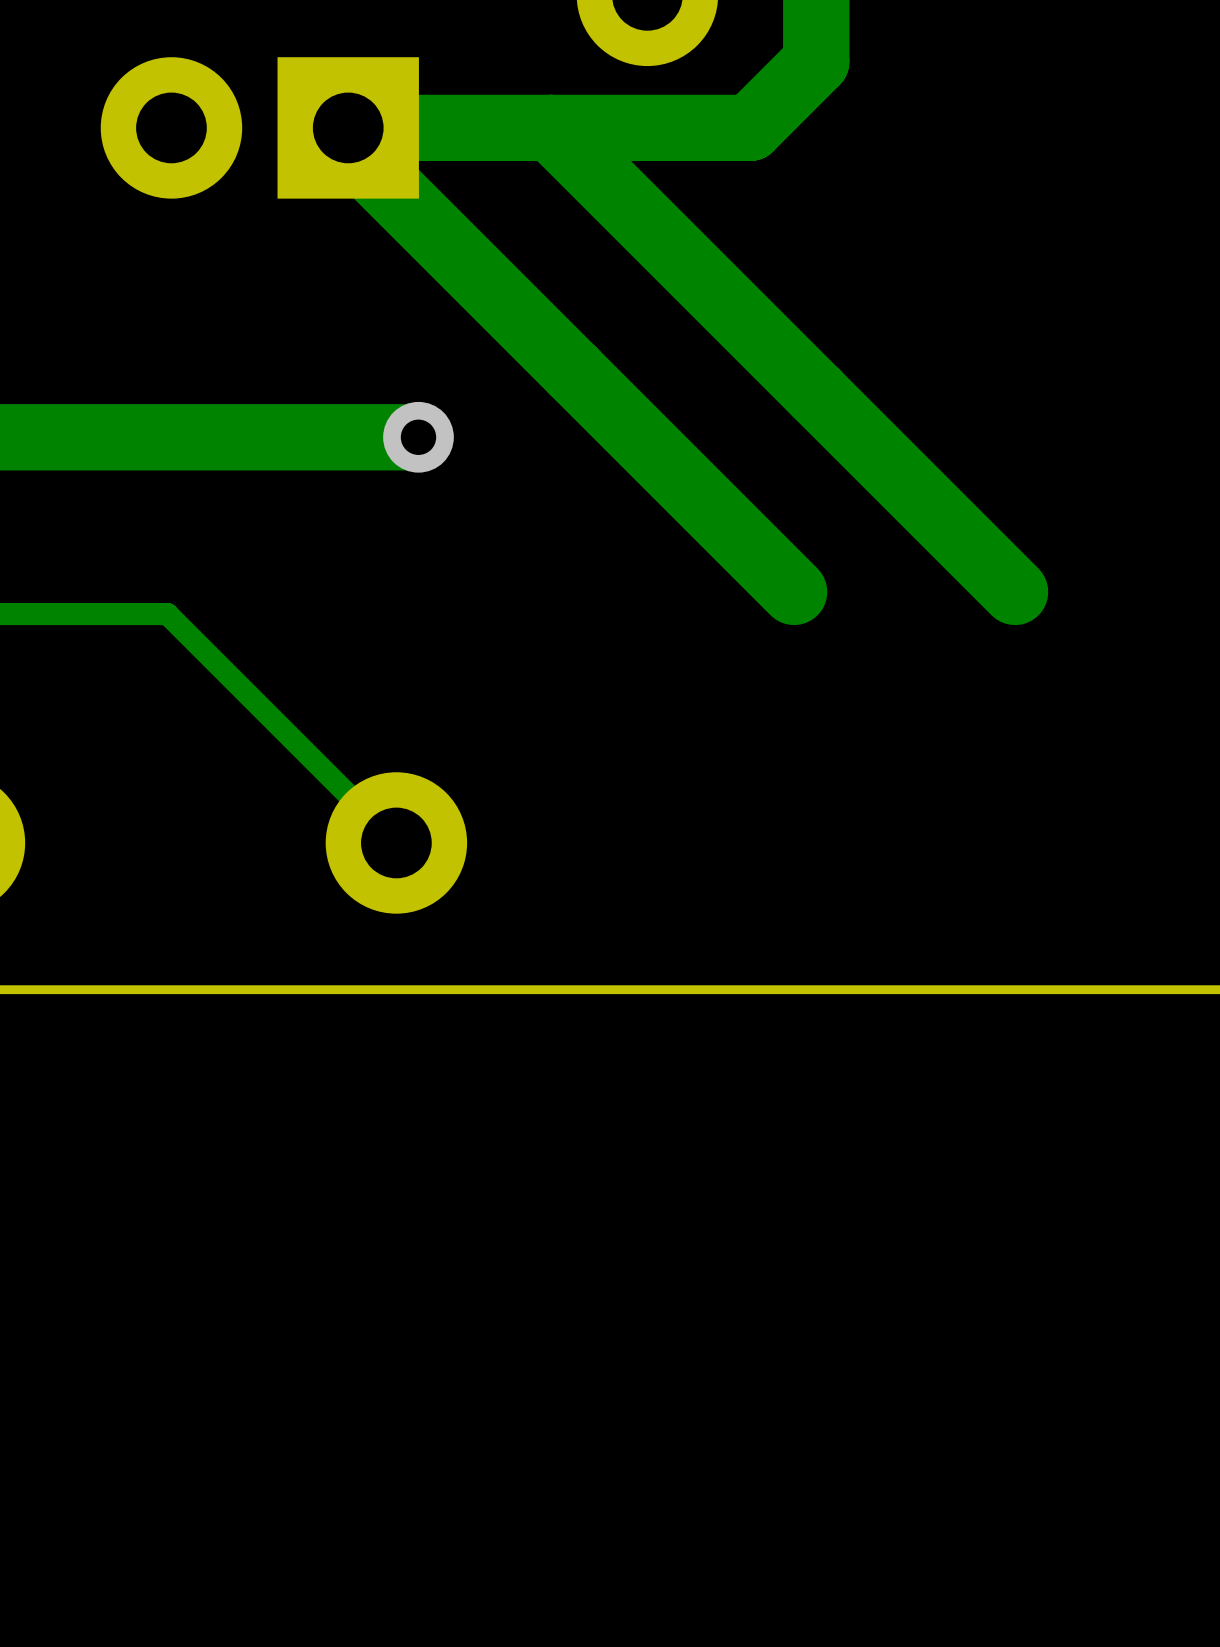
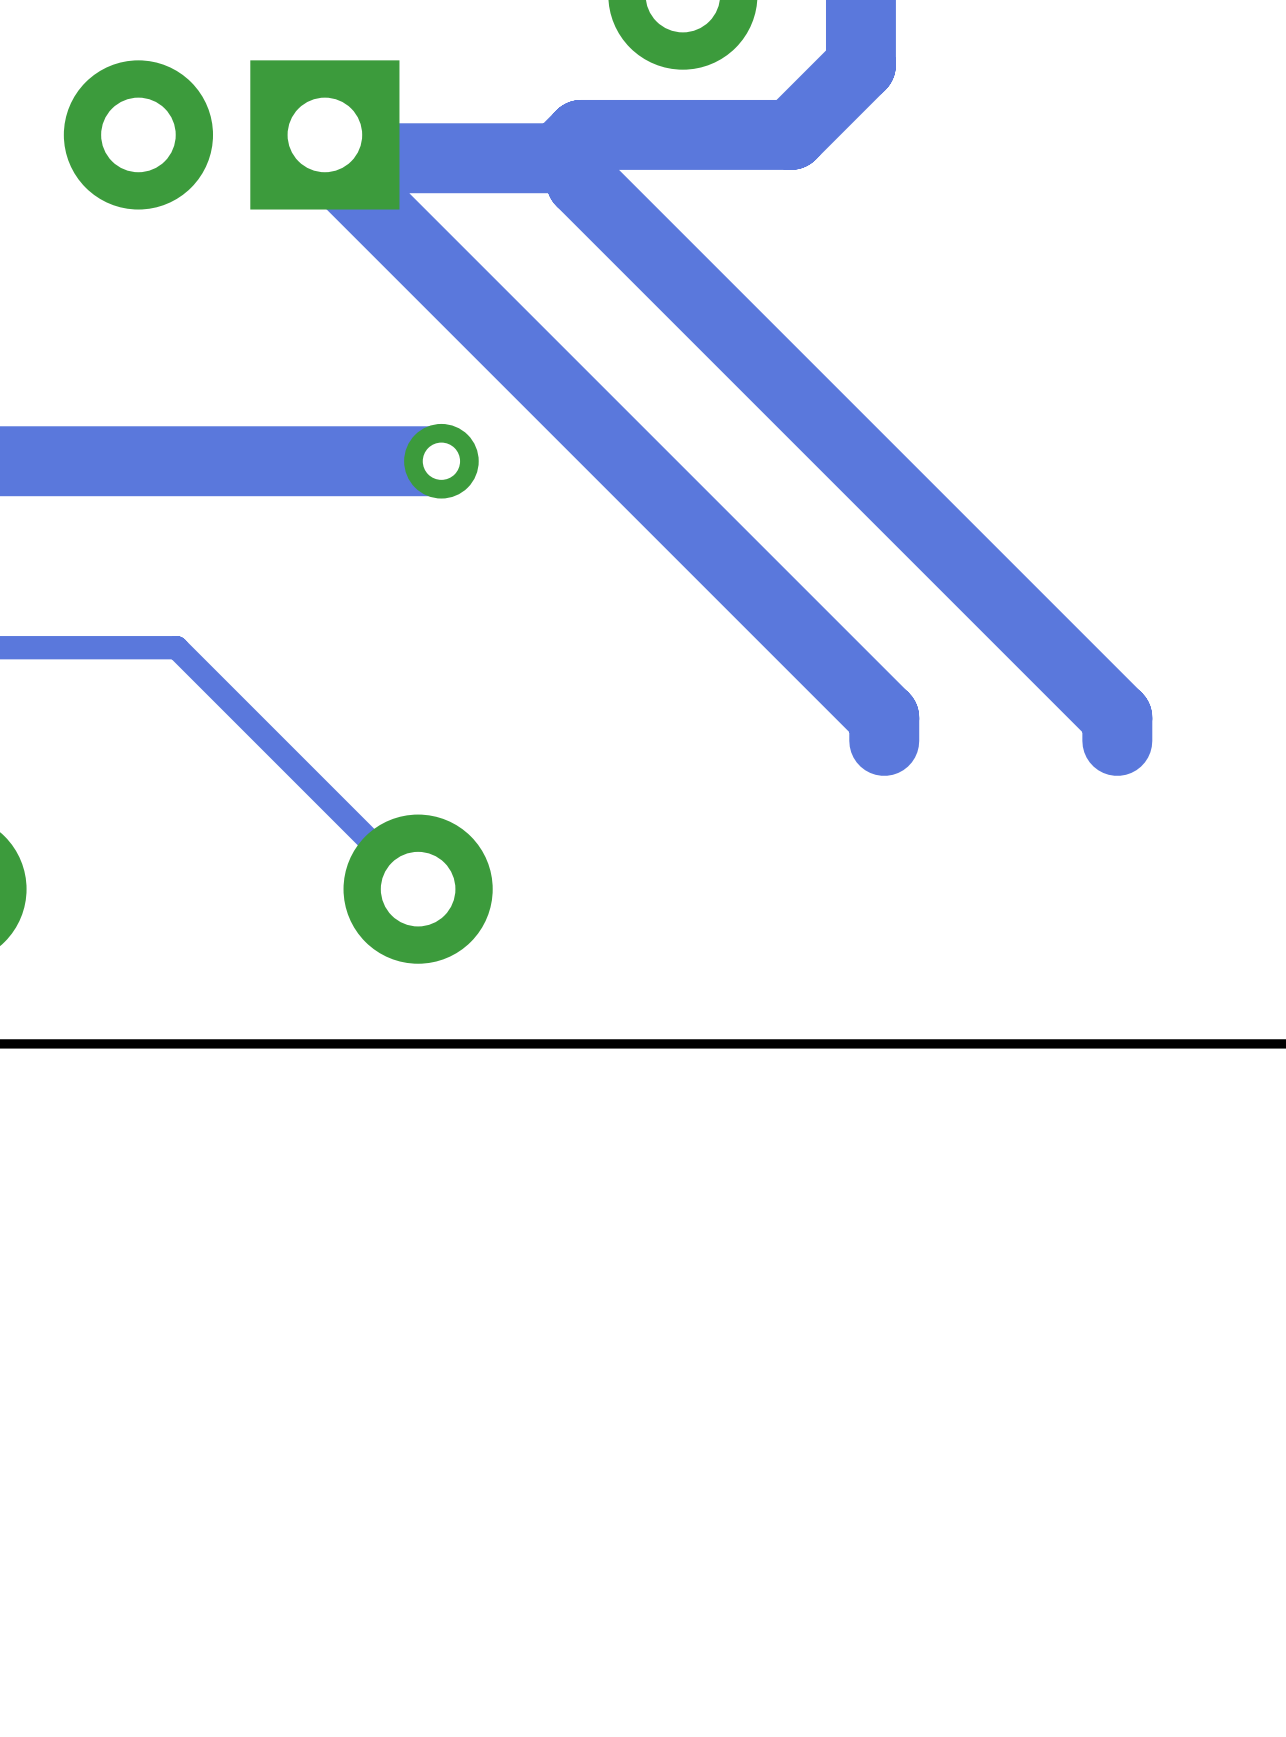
part position: (259, 127) -> (231, 134)
track: (1015, 591) (551, 127) (348, 127) (348, 146) (794, 591) -> none
track: none -> (1117, 740) (1117, 717) (581, 181) (581, 134) (557, 158) (348, 158) (324, 134) (324, 158) (884, 717) (884, 740)

